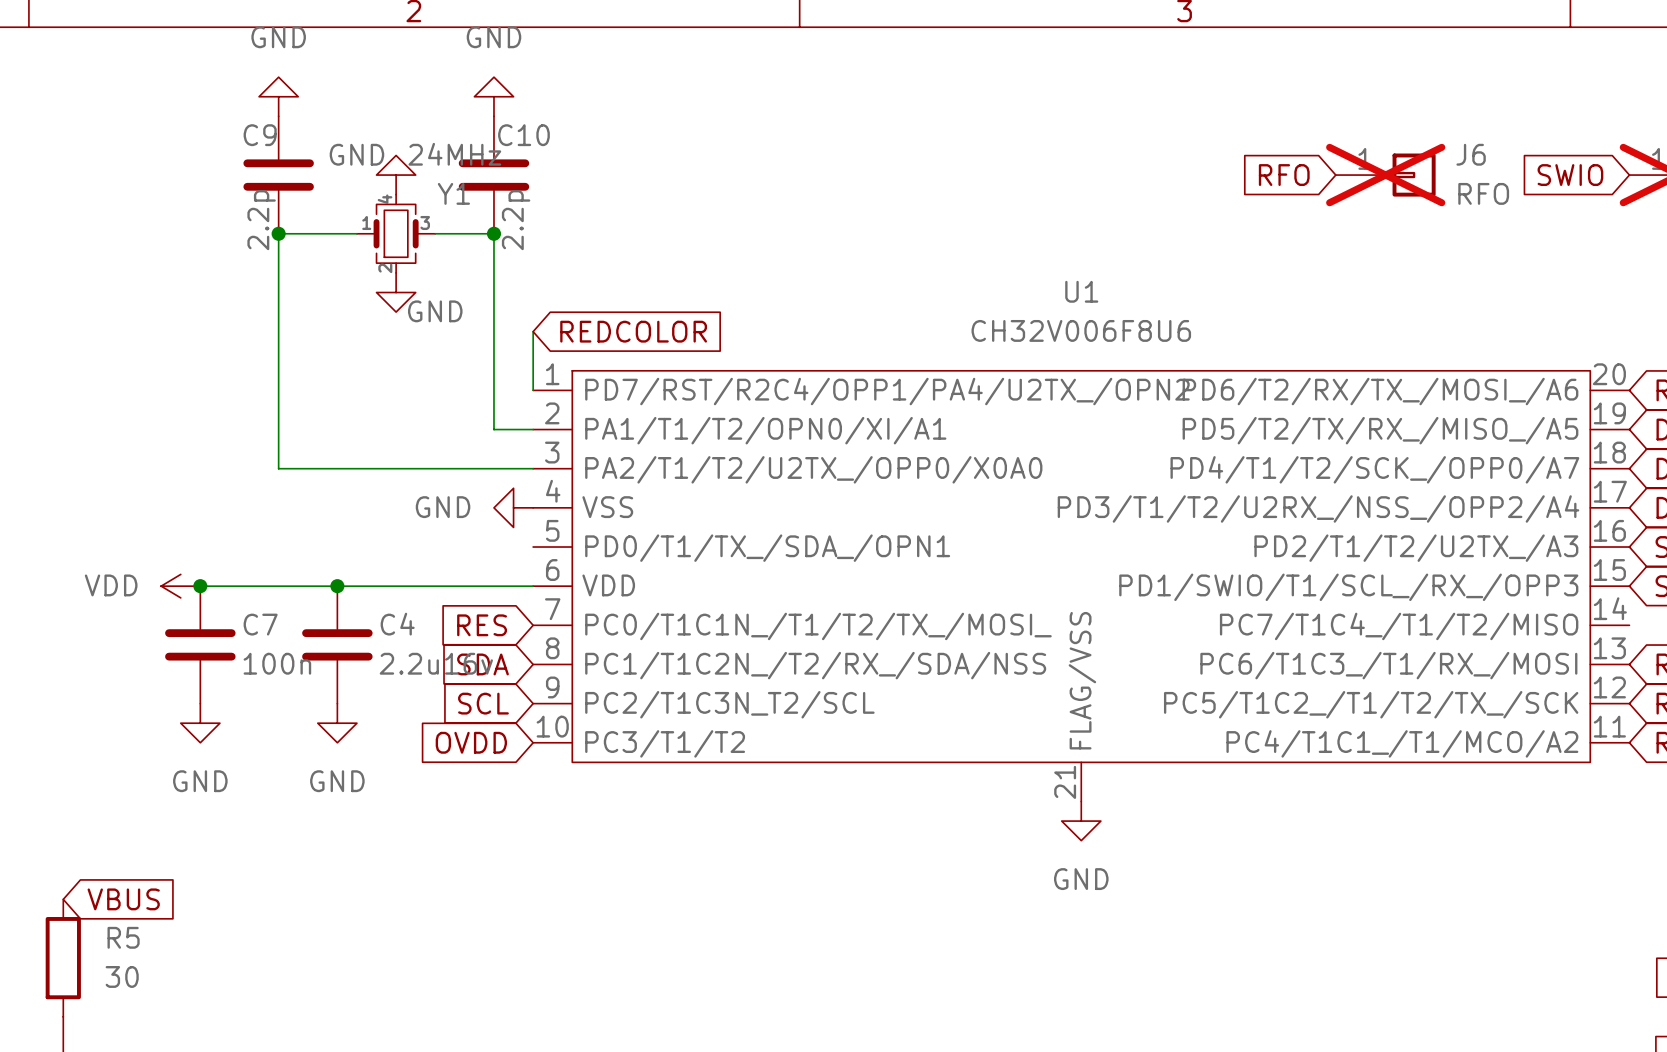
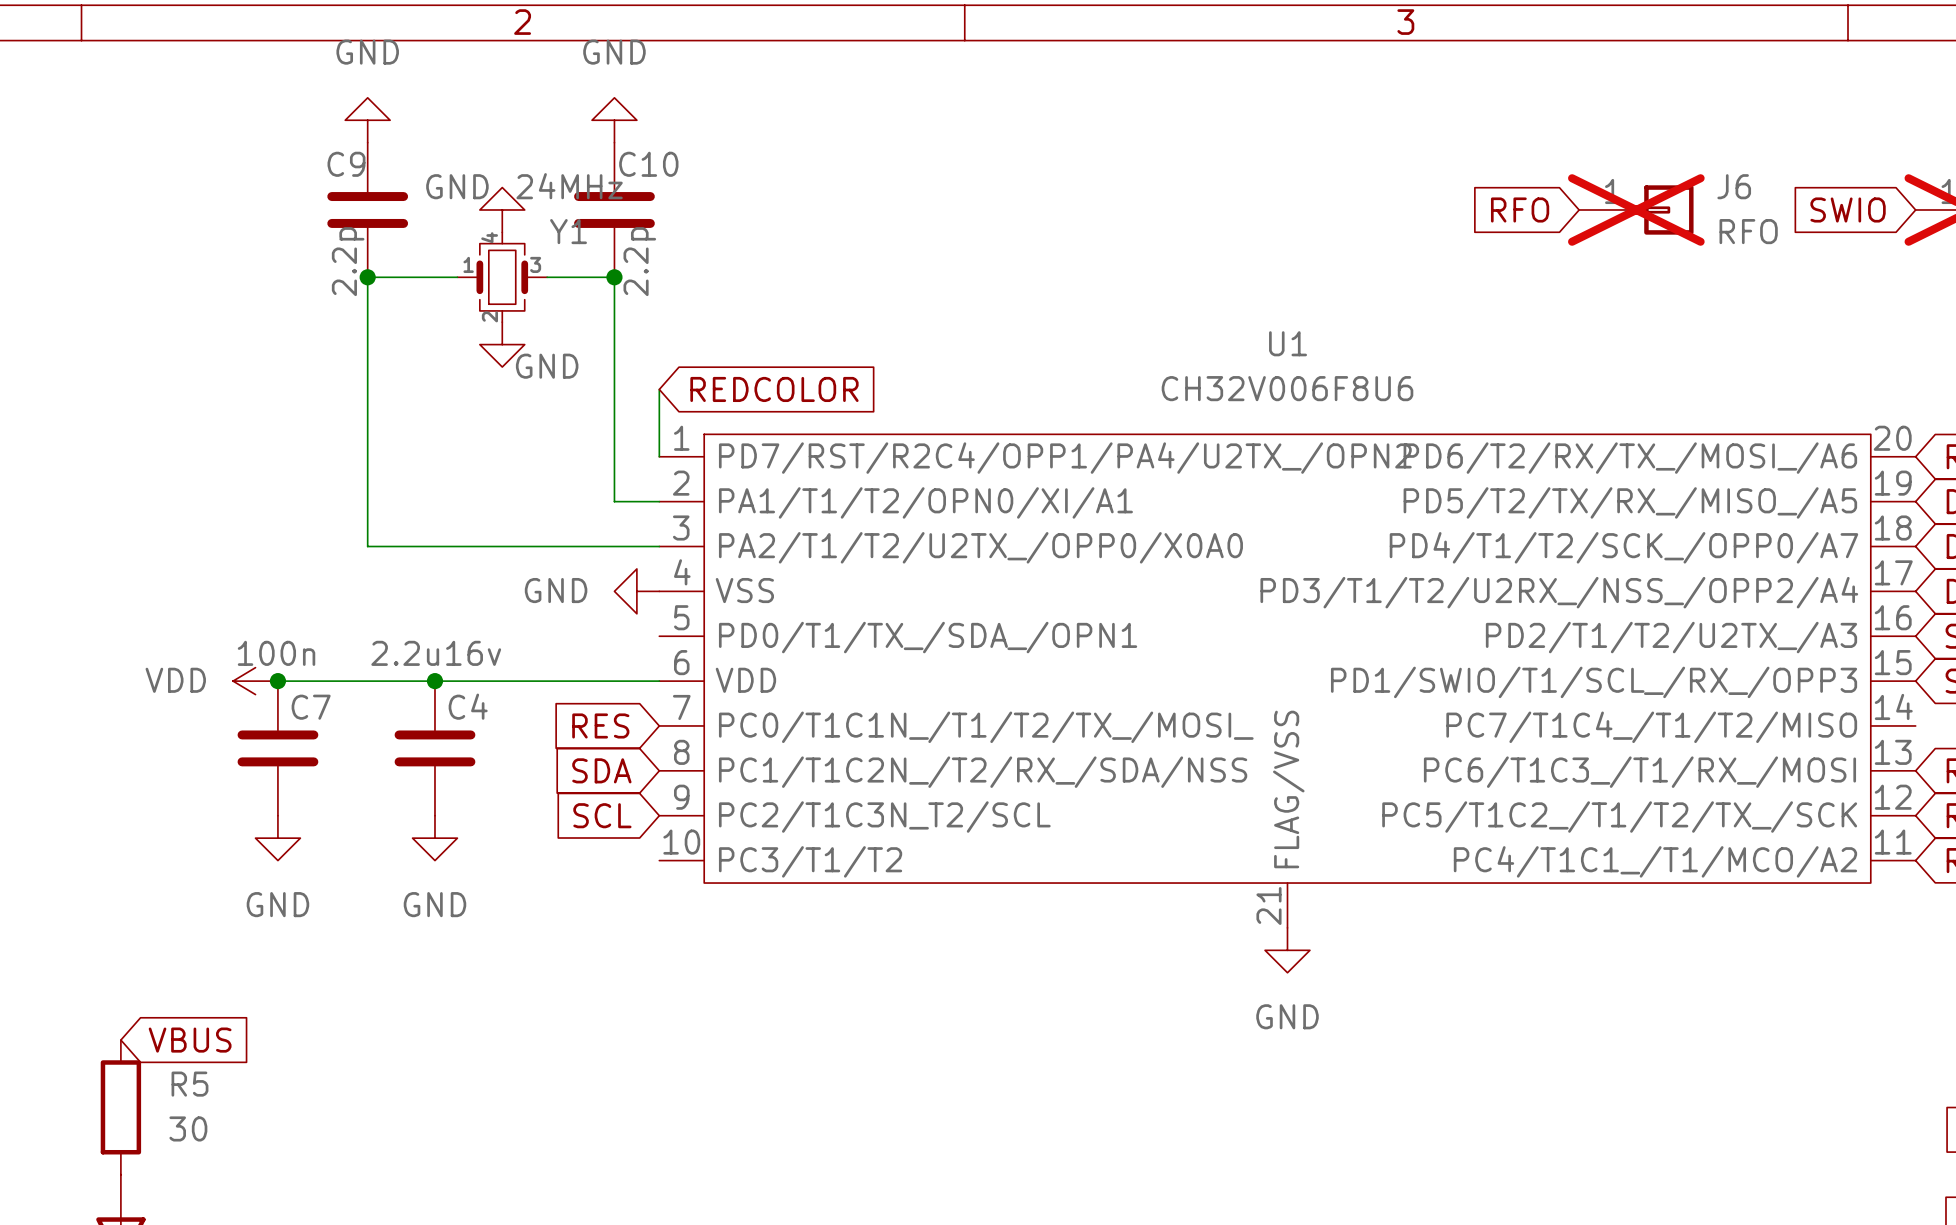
C7 name position: C7 (260, 624) -> C7 (311, 707)
C4 name position: C4 (397, 624) -> C4 (468, 706)
C7 value position: 100n (277, 663) -> 100n (276, 653)
C4 value position: 2.2u16v (436, 663) -> 2.2u16v (436, 653)
global label: OVDD (471, 742) -> none

